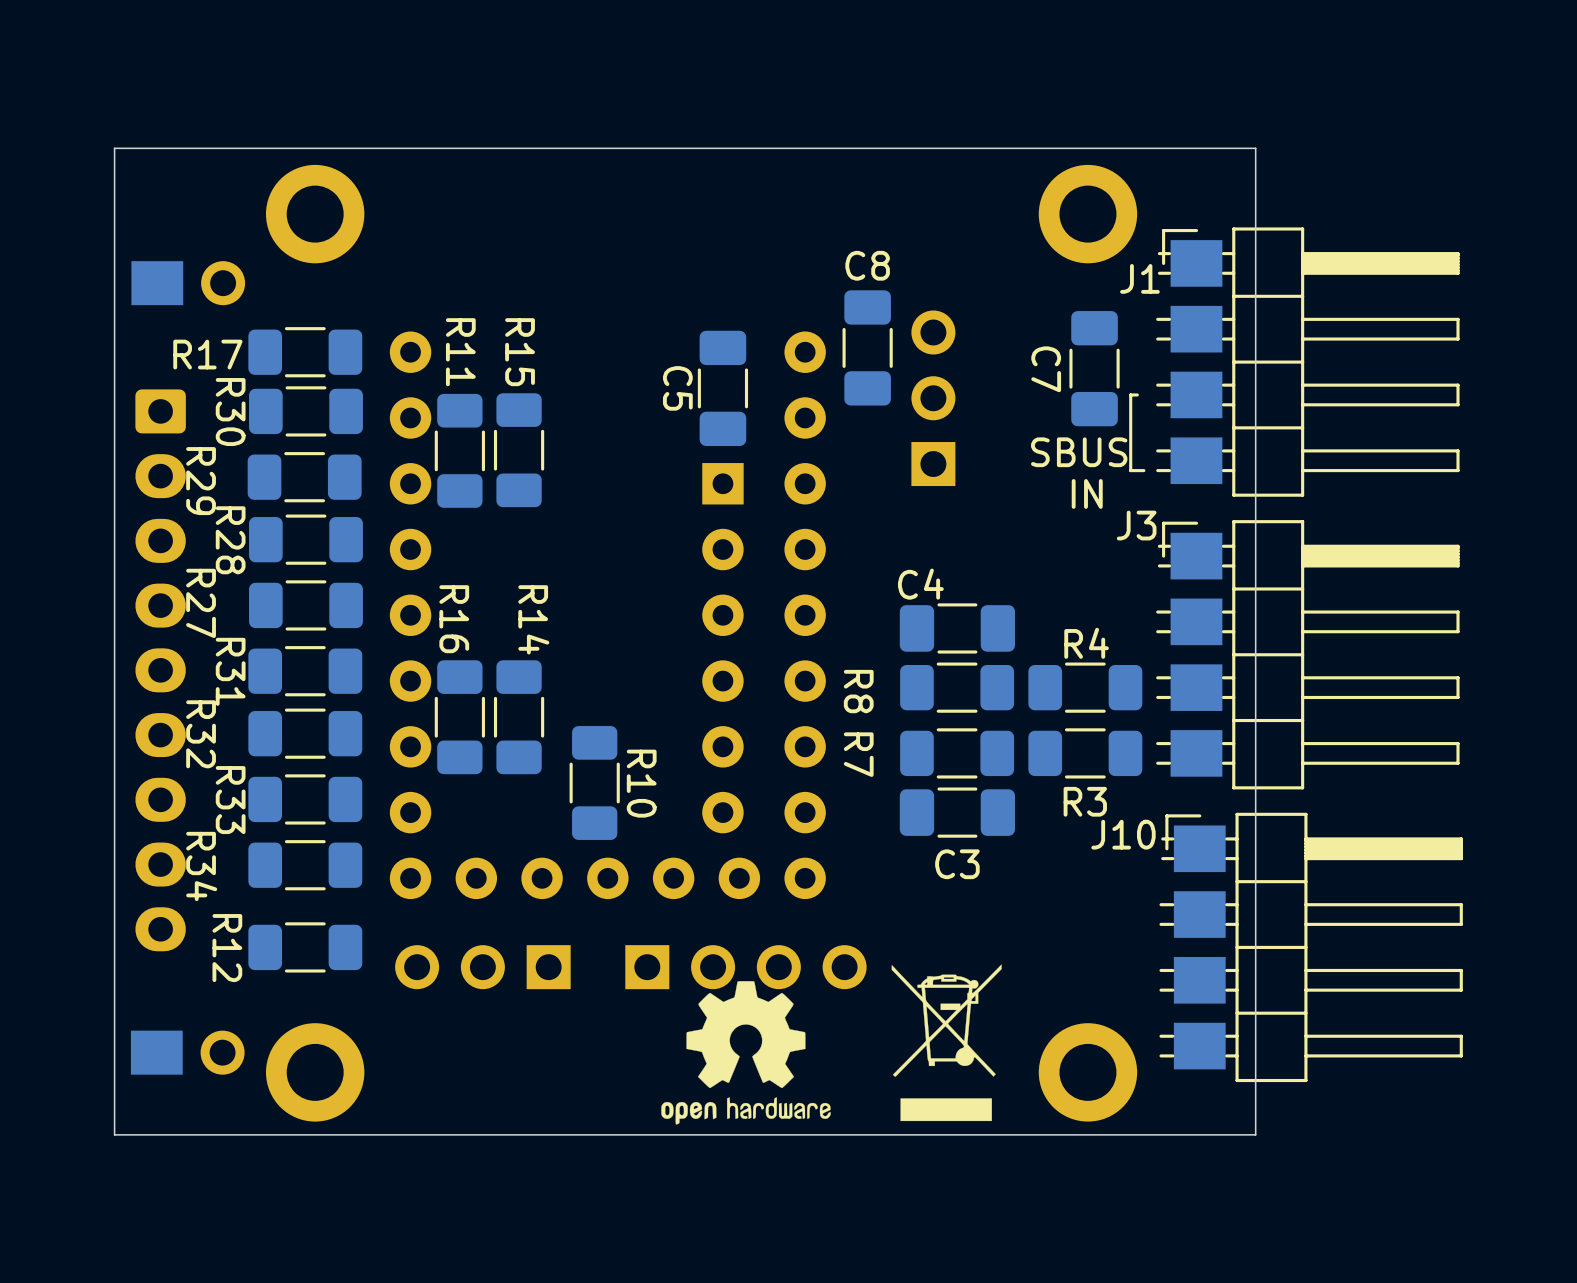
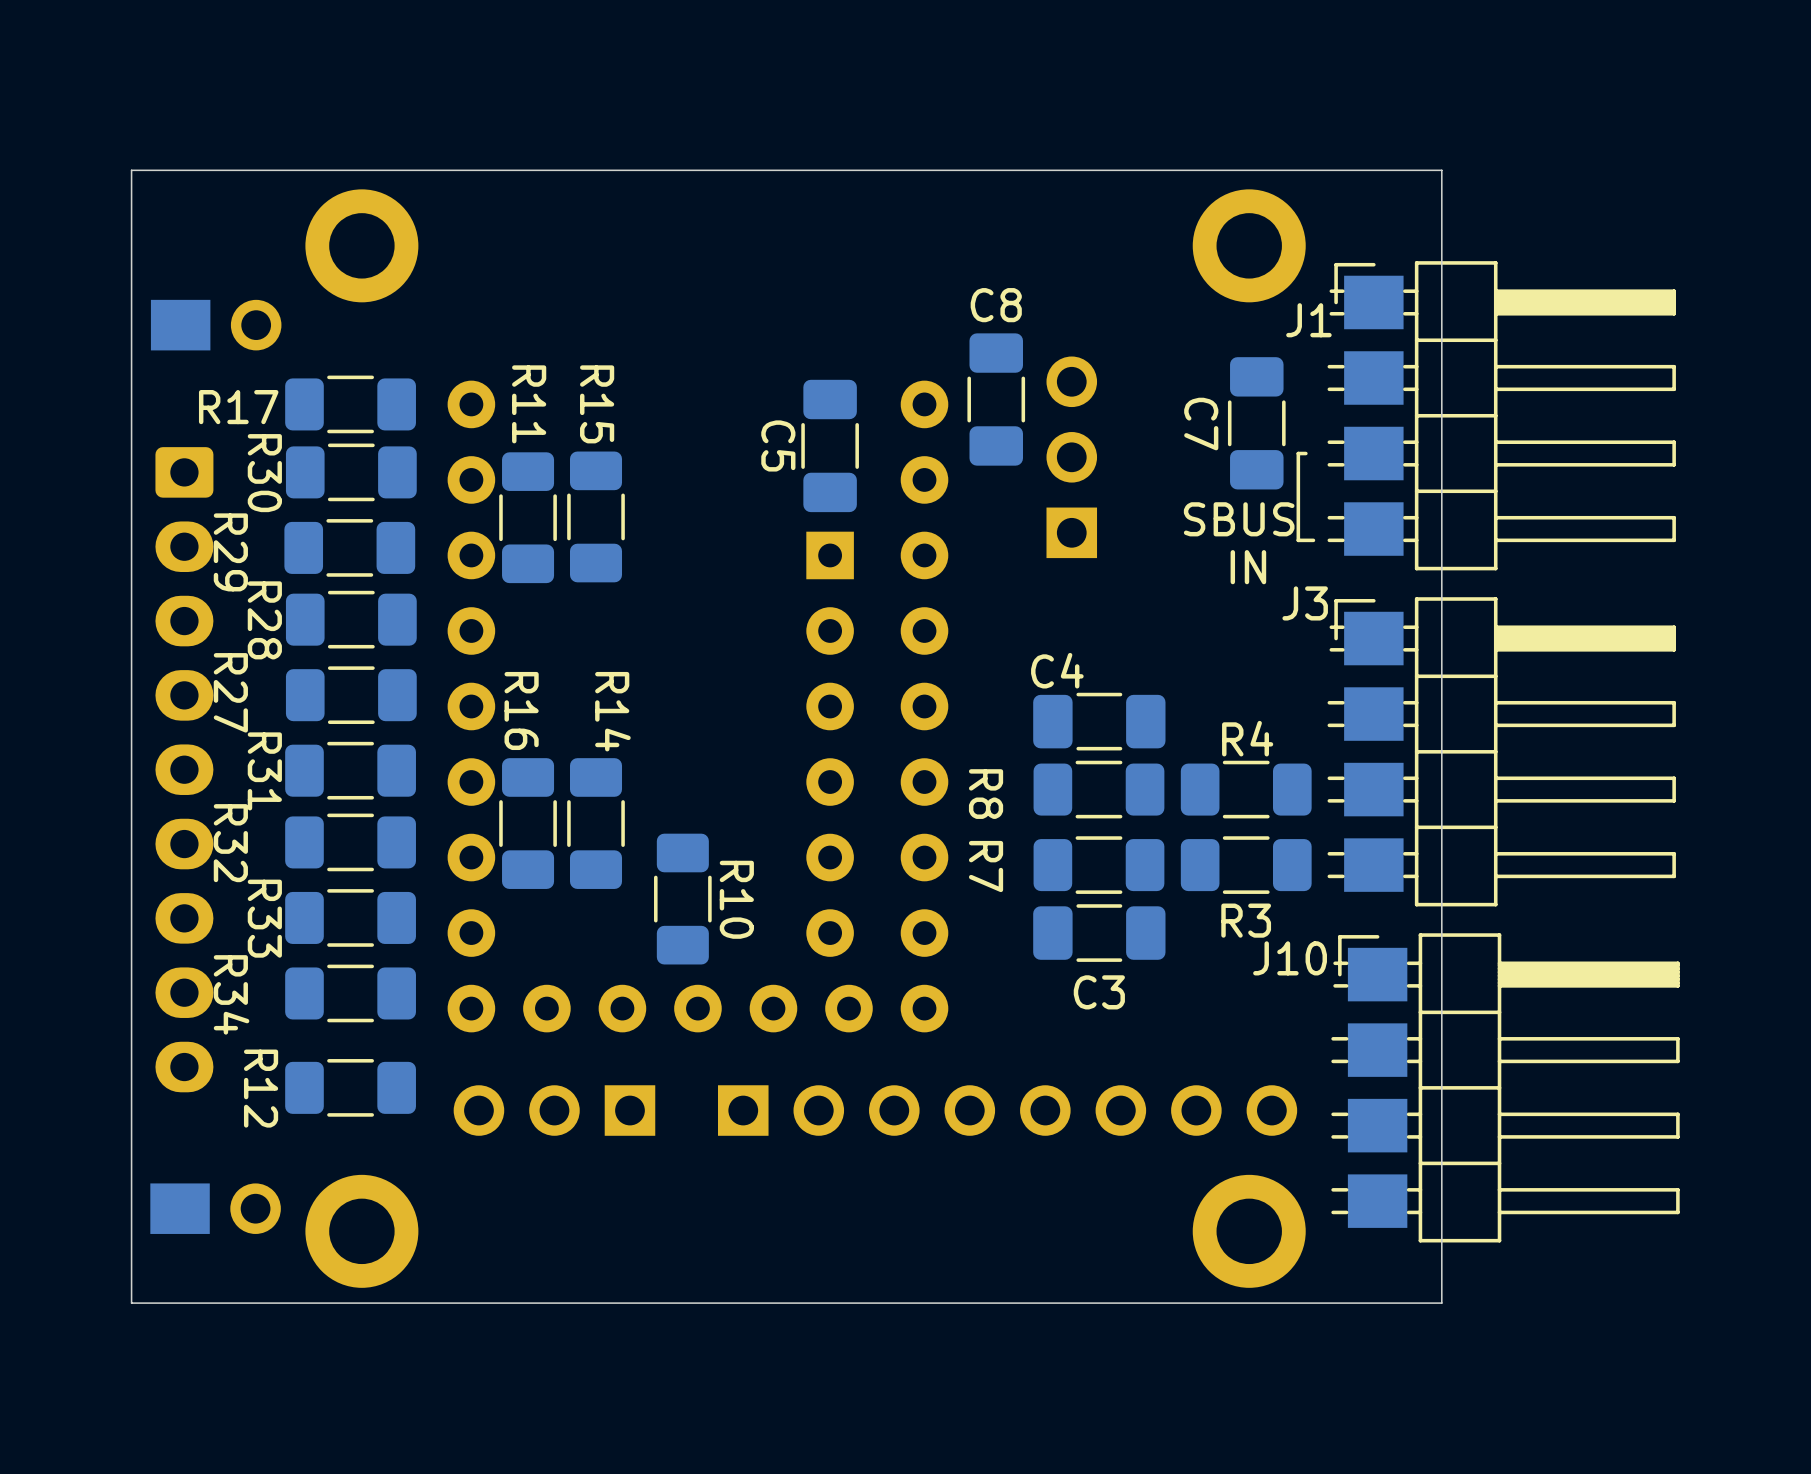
drawing: [891, 964, 1002, 1122] -> none
part: none -> (1007, 1110)
drawing: [661, 981, 831, 1125] -> none

